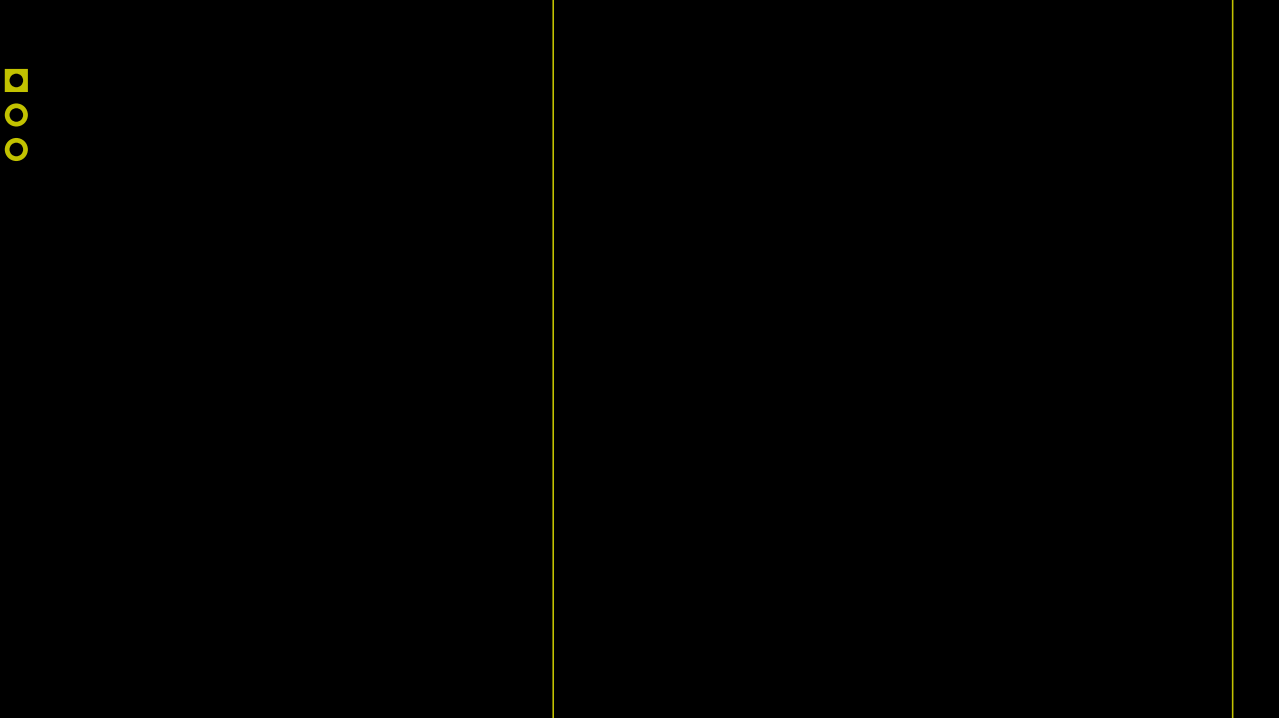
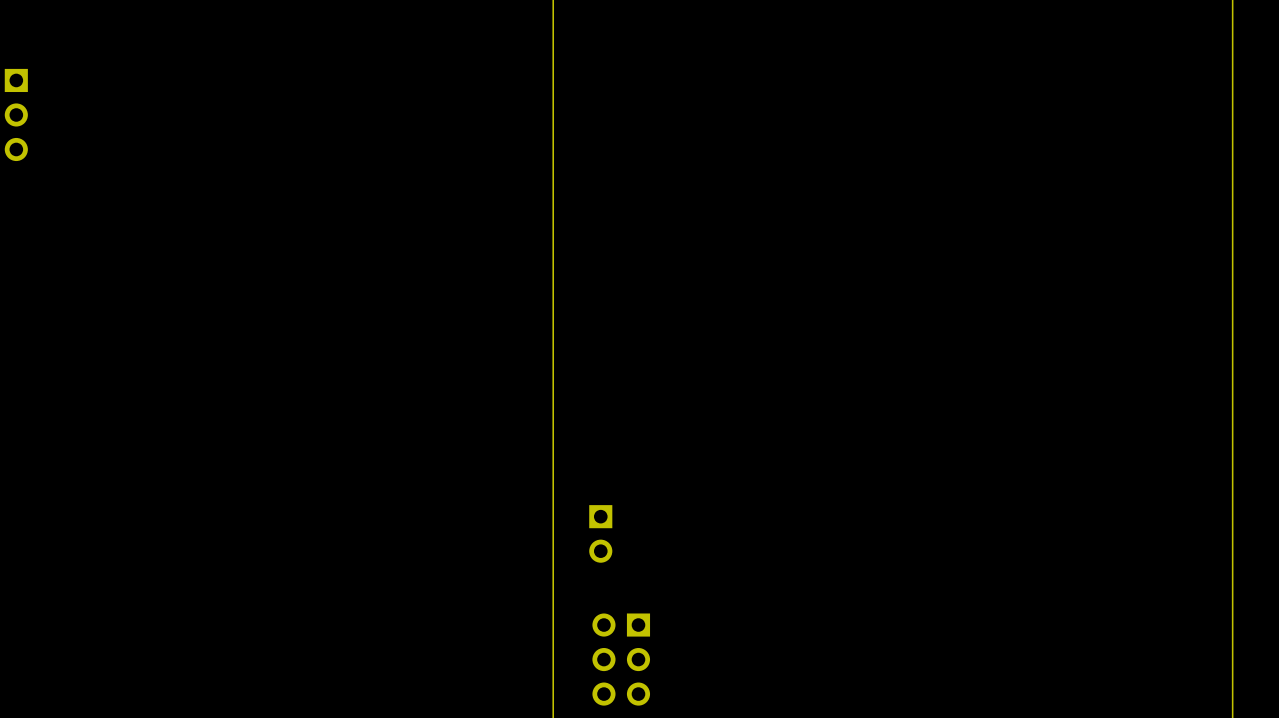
part: none -> (600, 533)
part: none -> (621, 659)

